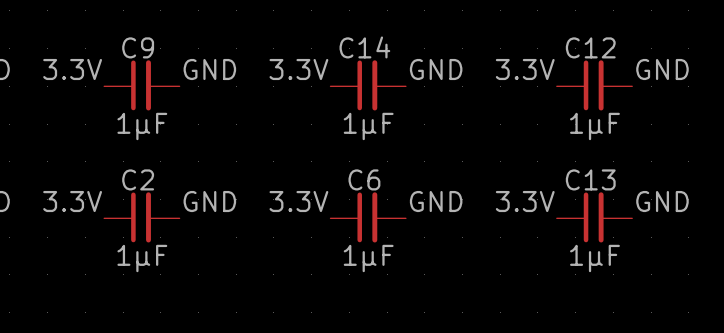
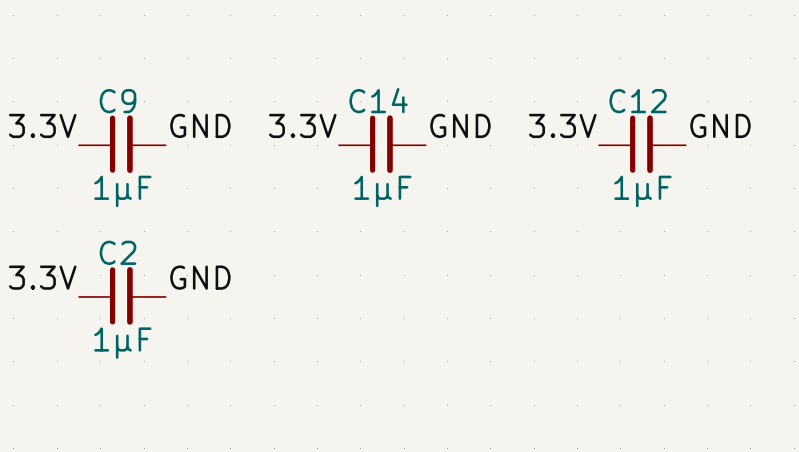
label: 3.3V (298, 201) -> none
label: GND (436, 201) -> none
label: 3.3V (525, 201) -> none
label: GND (662, 201) -> none
C6: 1μF (368, 217) -> none
C13: 1μF (594, 217) -> none

